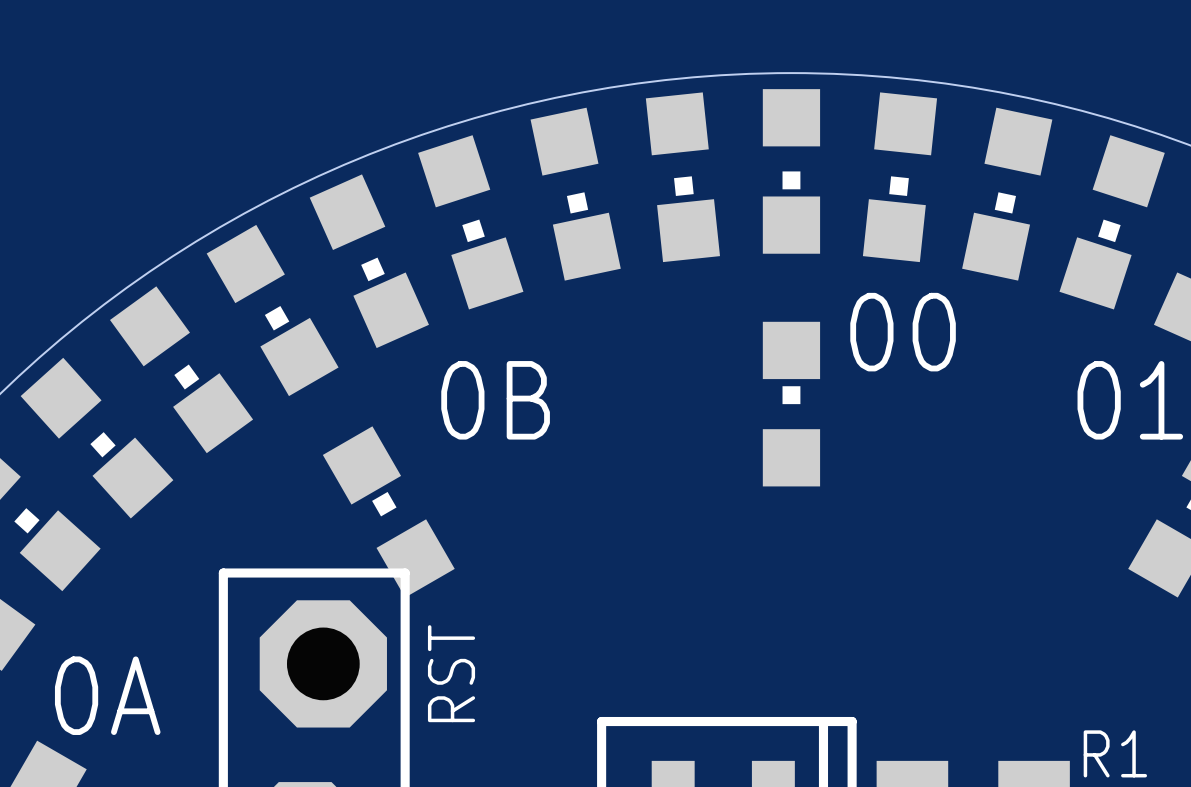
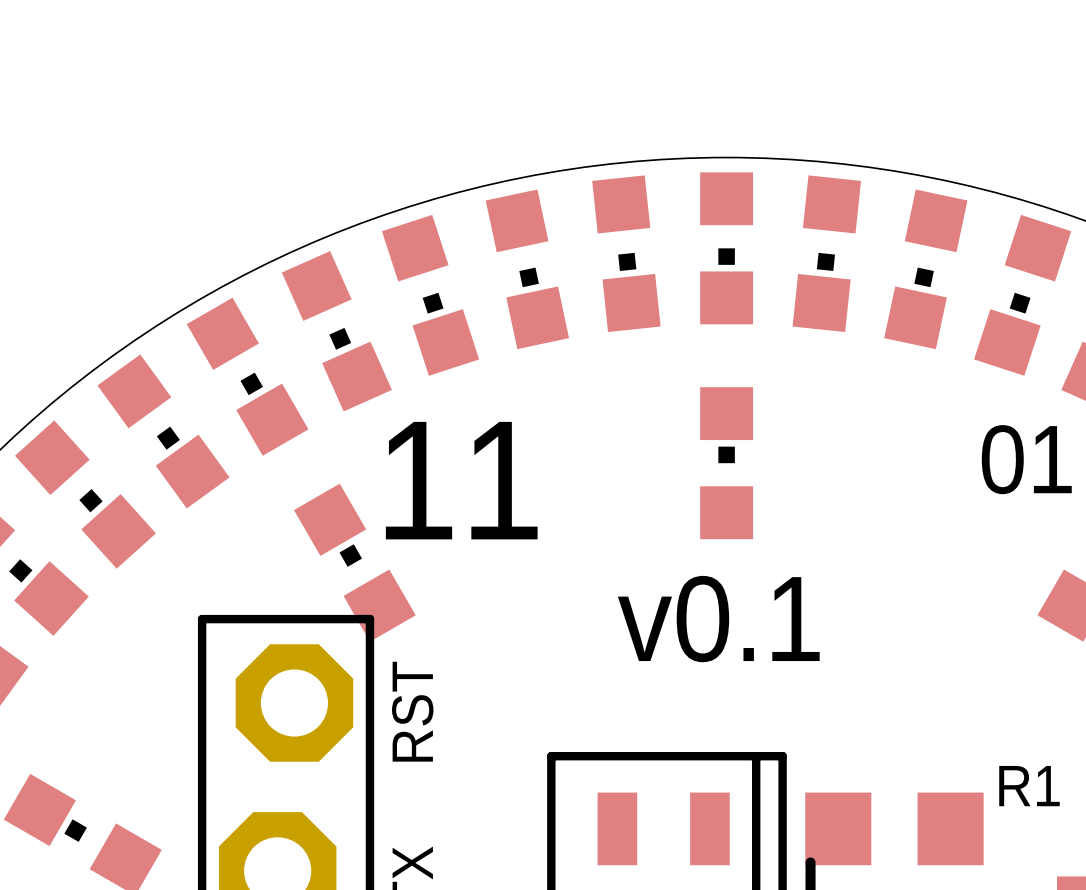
text: 00 (903, 332) -> none
text: 0B (495, 400) -> 11 (461, 480)
text: none -> v0.1 (718, 619)
text: 0A (107, 695) -> none

